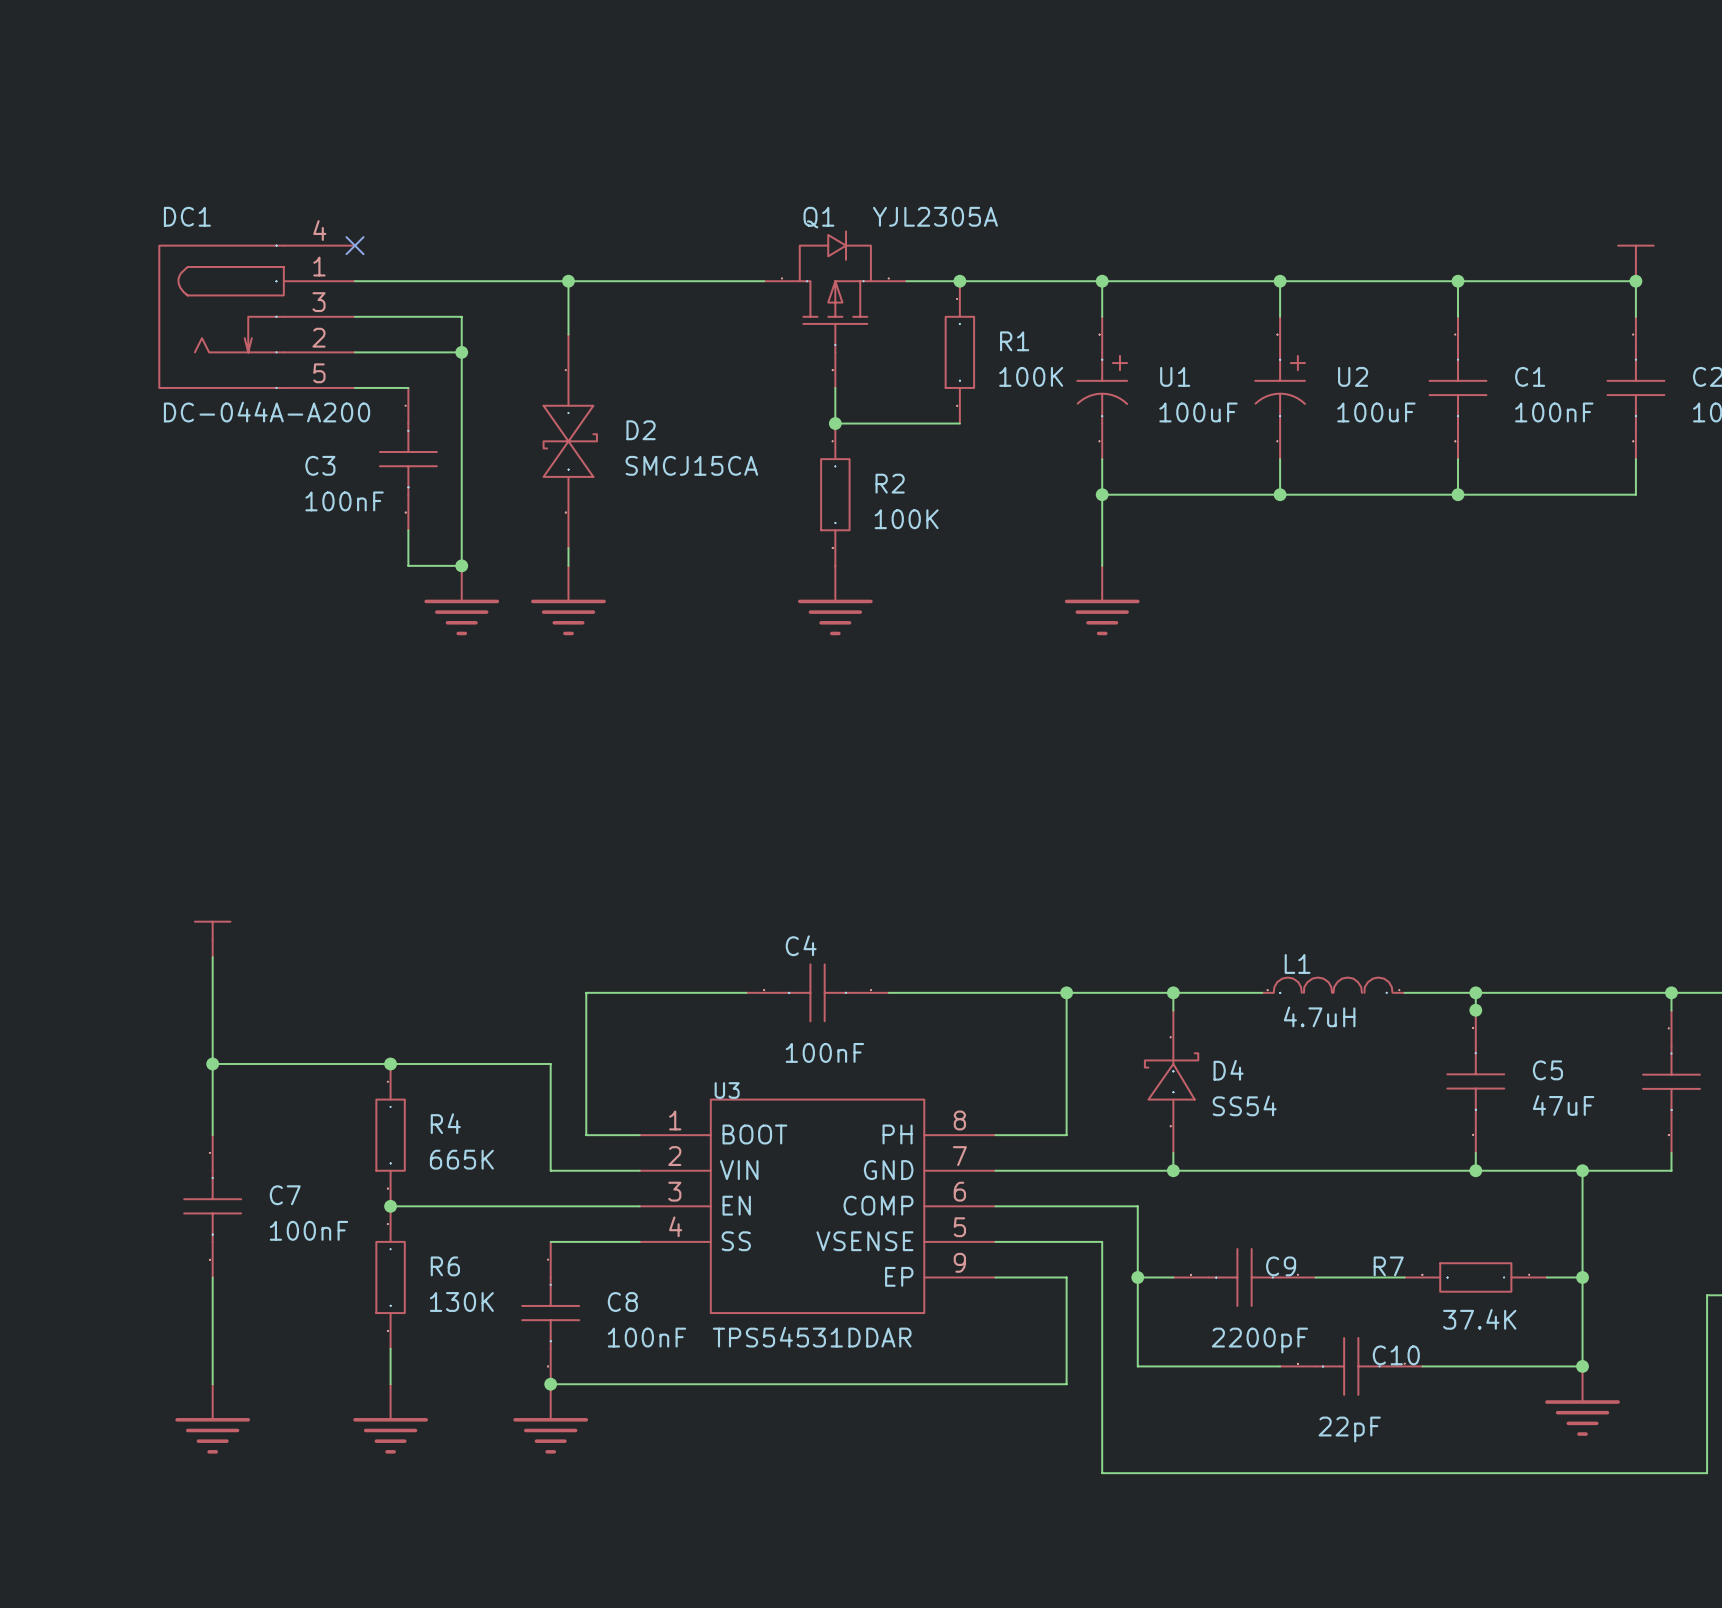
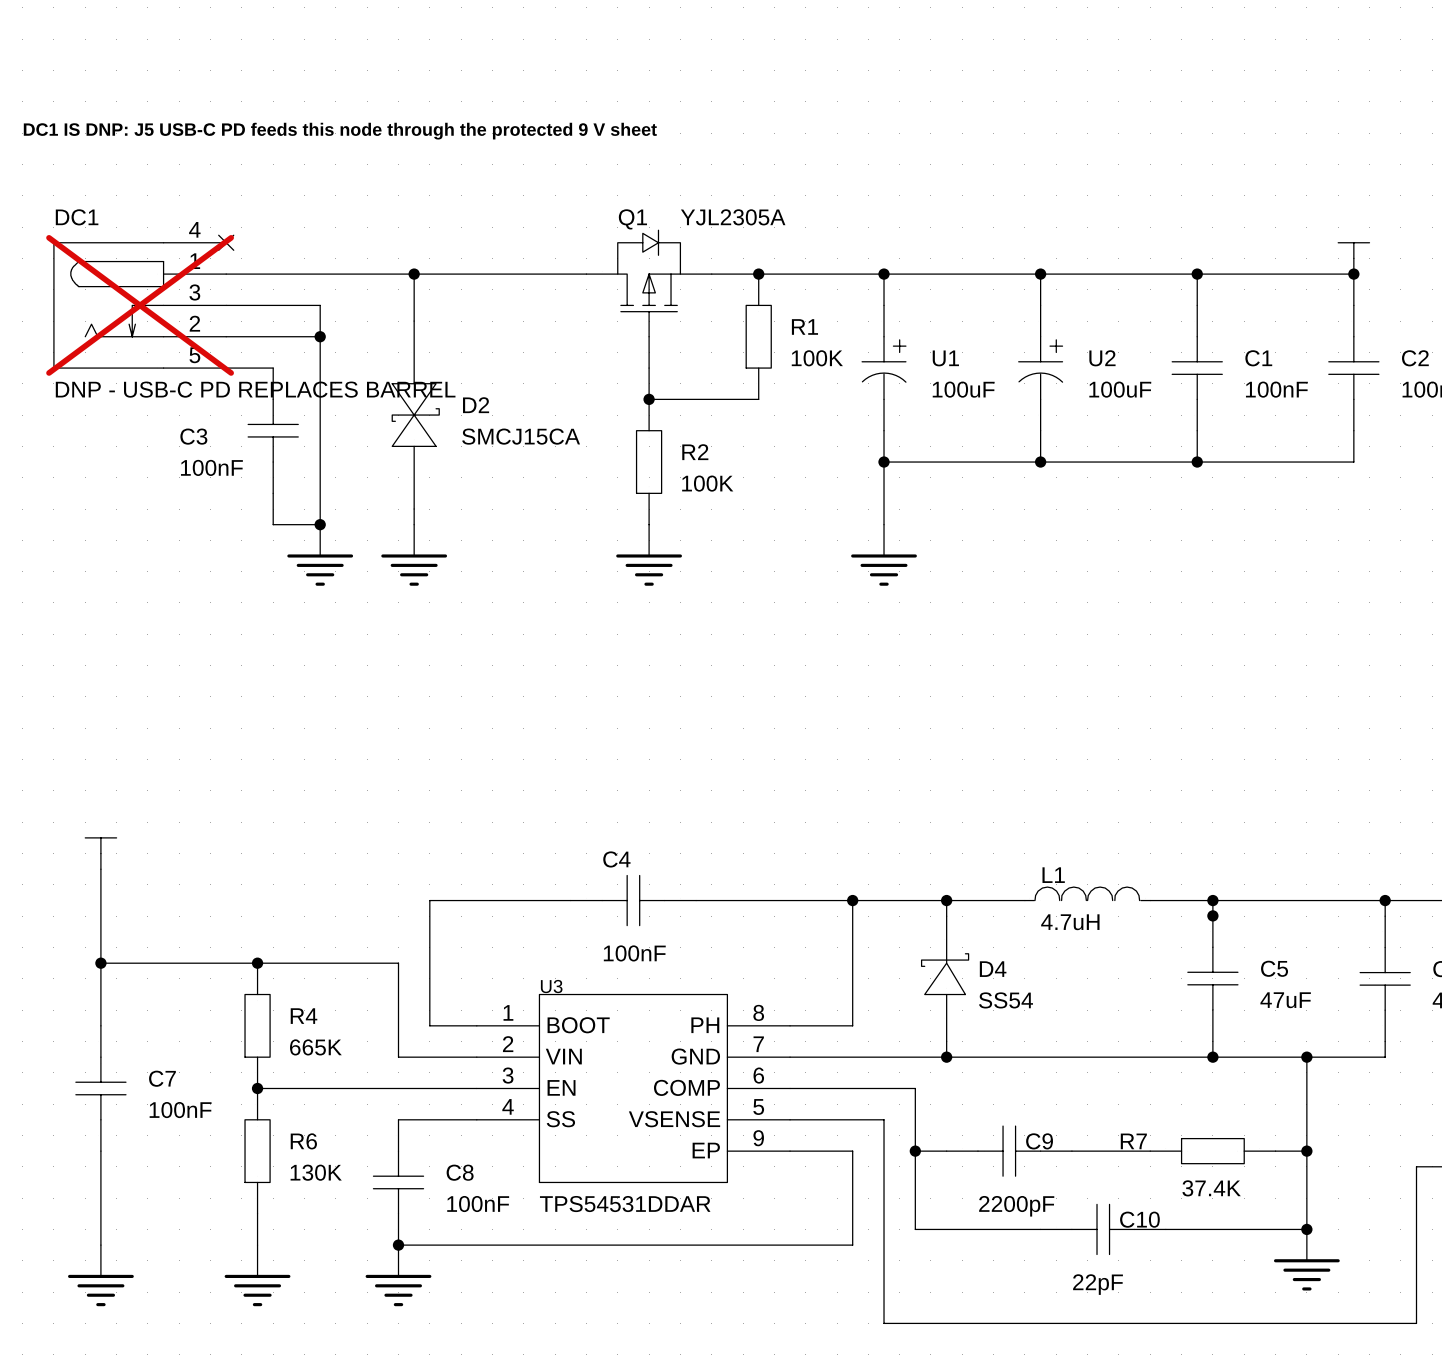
text: none -> DC1 IS DNP: J5 USB-C PD feeds this node through the protected 9 V sheet (340, 131)
DC1 do-not-place cross: none -> (140, 305)
DC1 value: DC-044A-A200 (267, 412) -> DNP - USB-C PD REPLACES BARREL (255, 389)

